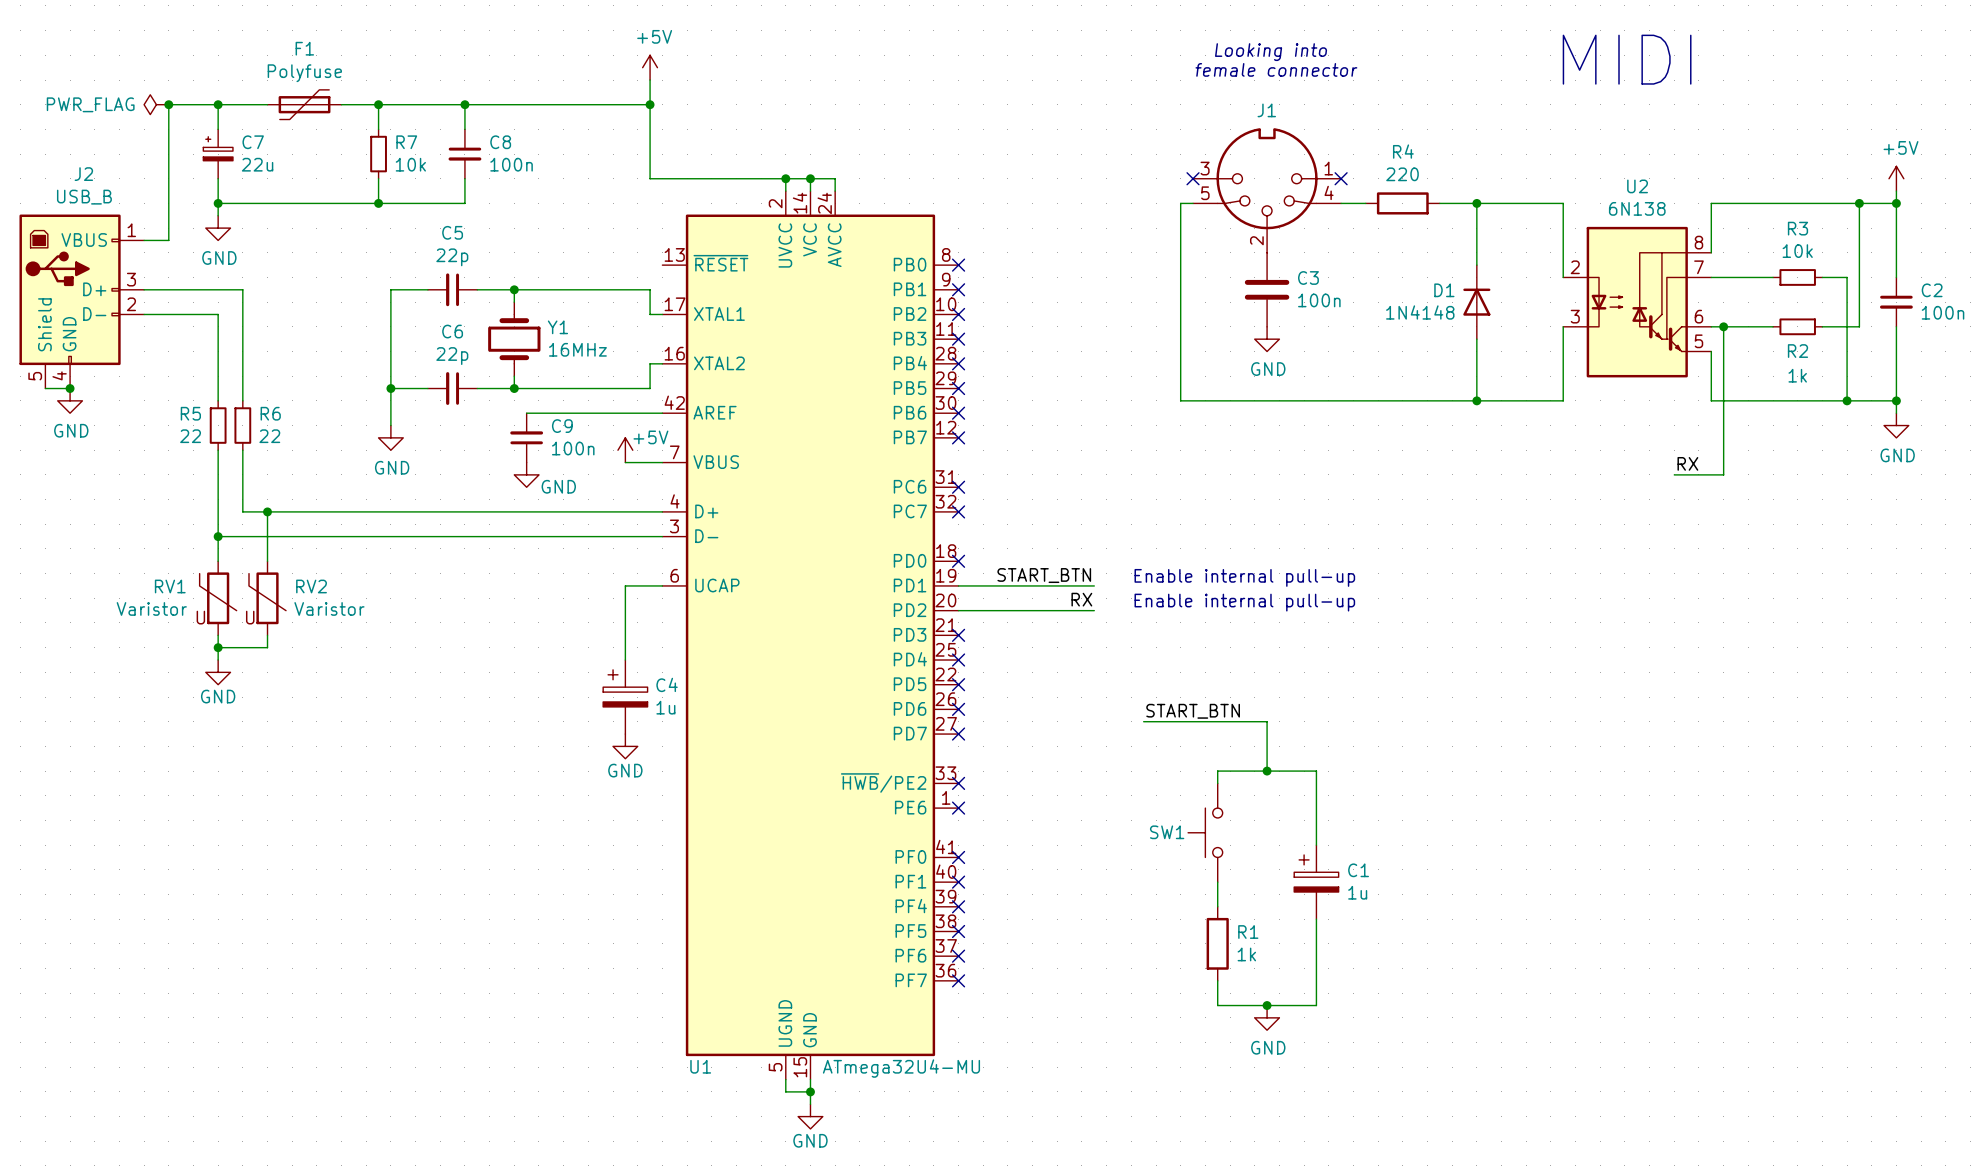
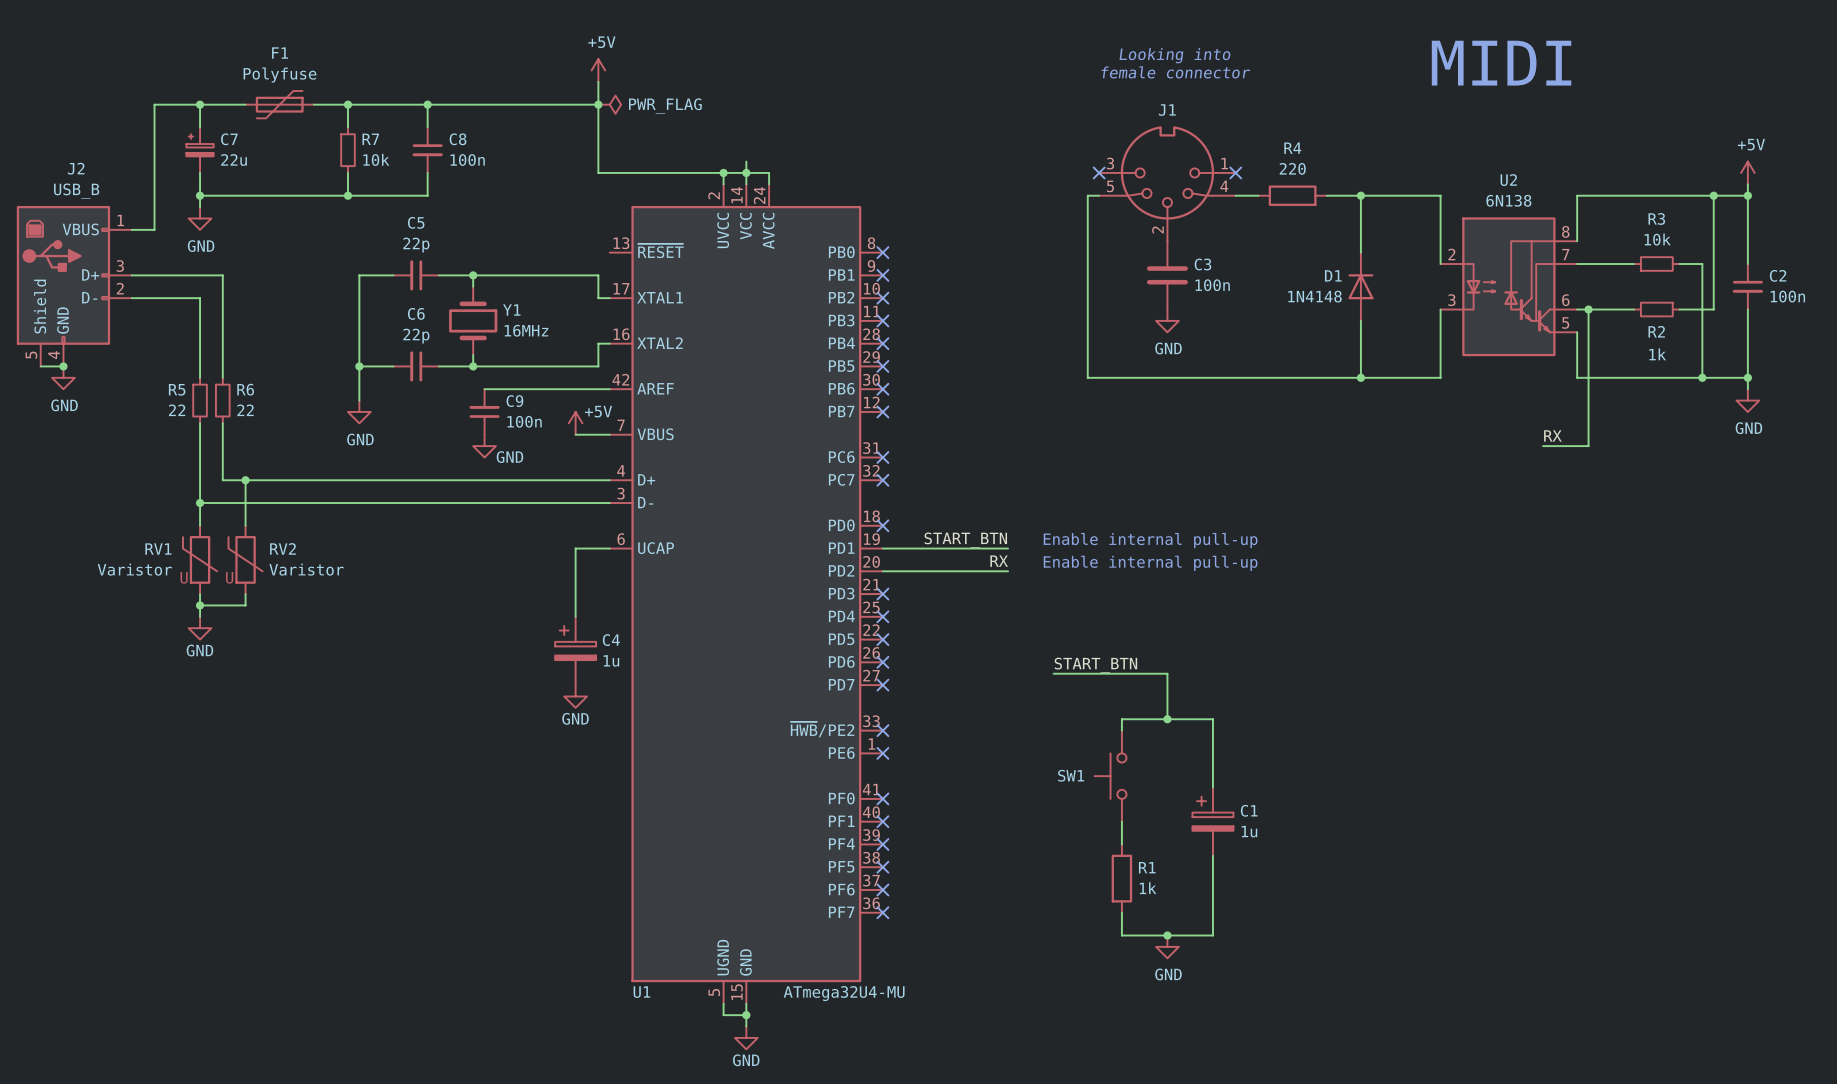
power symbol: PWR_FLAG (156, 104) -> none
junction: (168, 104) -> none
power symbol: none -> PWR_FLAG (609, 104)
wire: none -> (746, 161) (746, 172)

